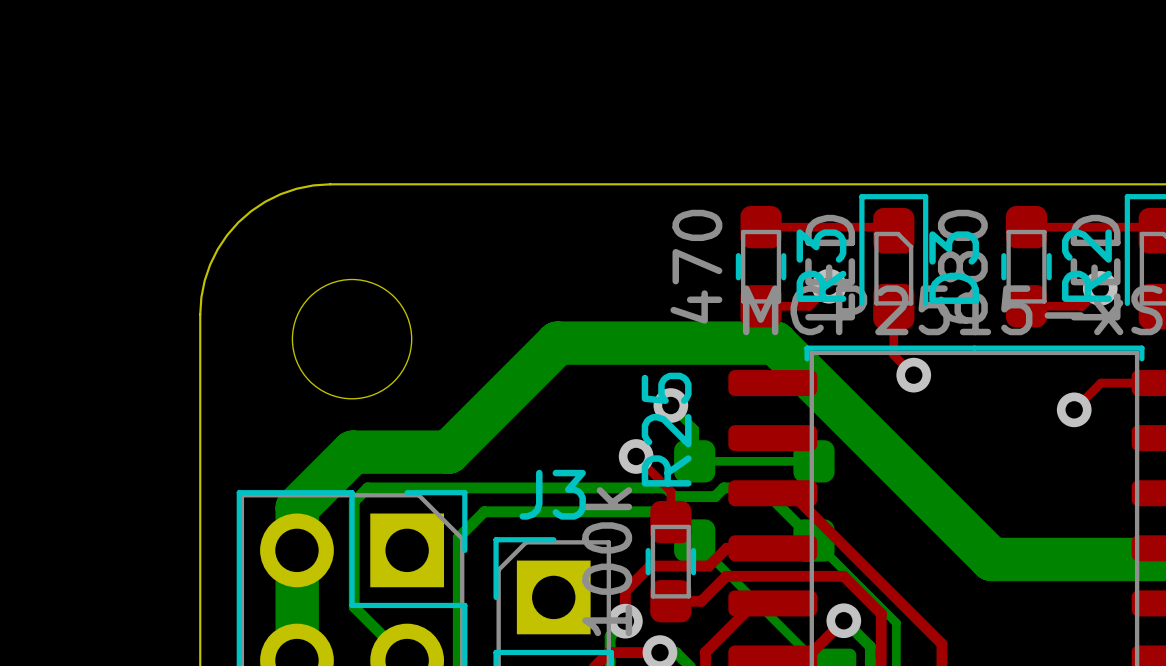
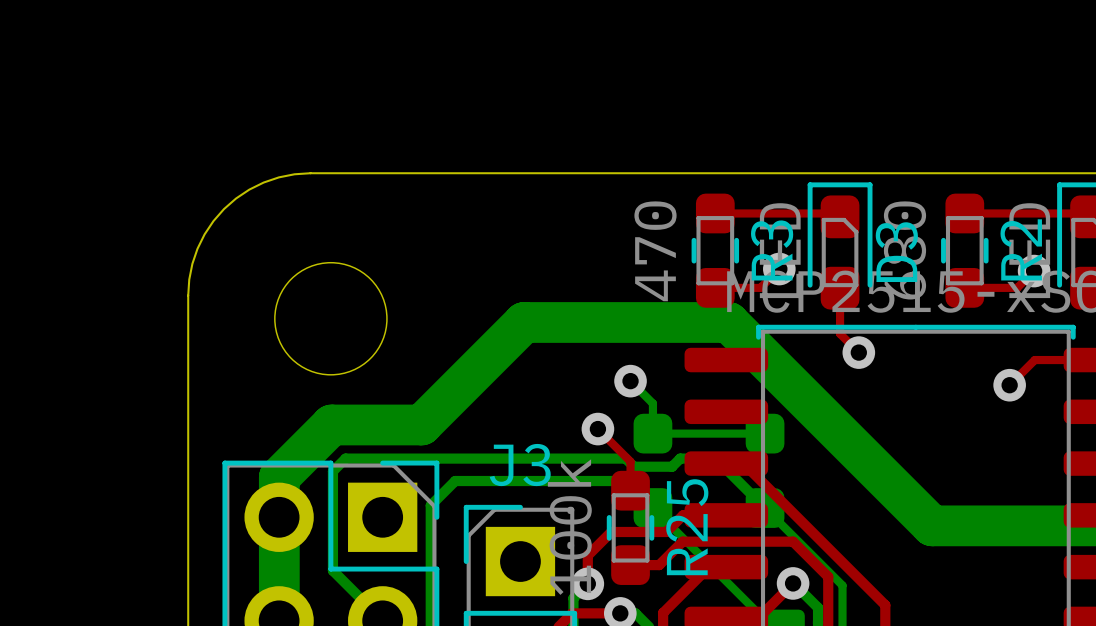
R25 name position: R25 (666, 429) -> R25 (687, 527)

